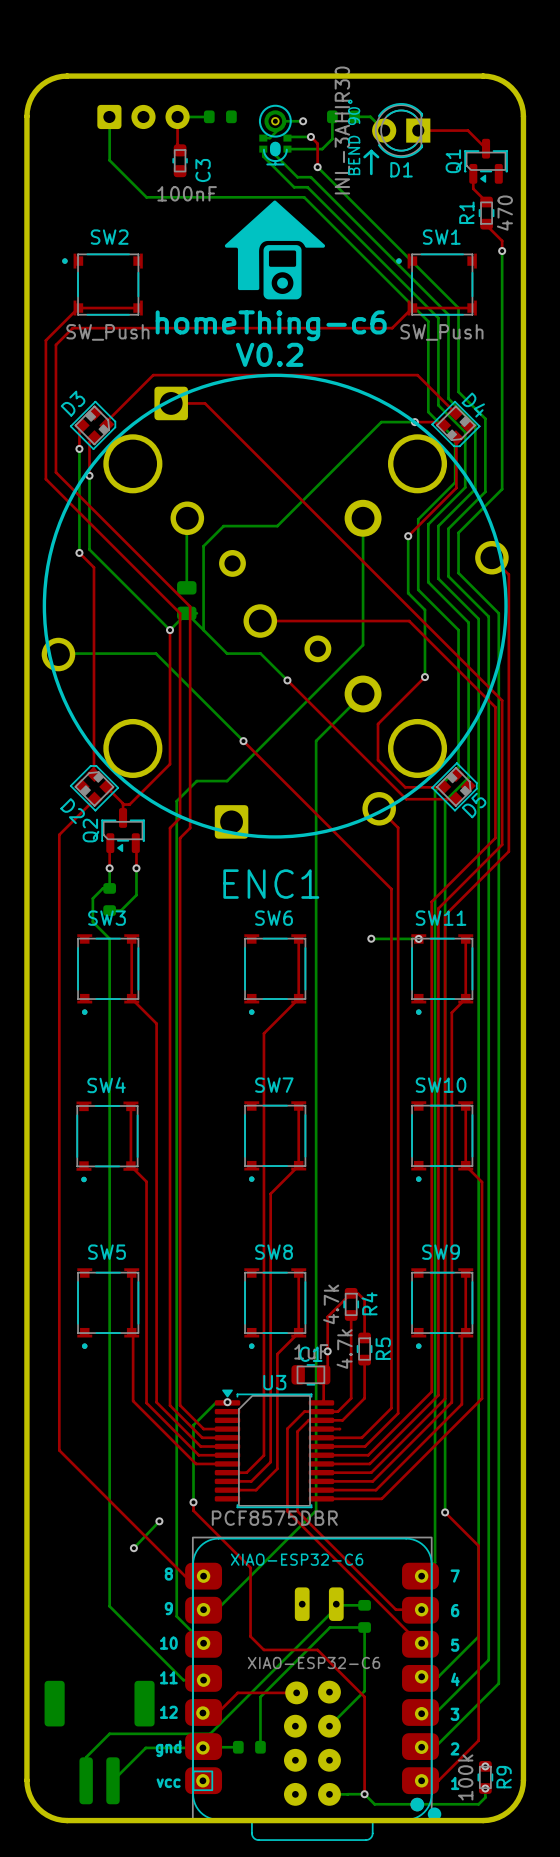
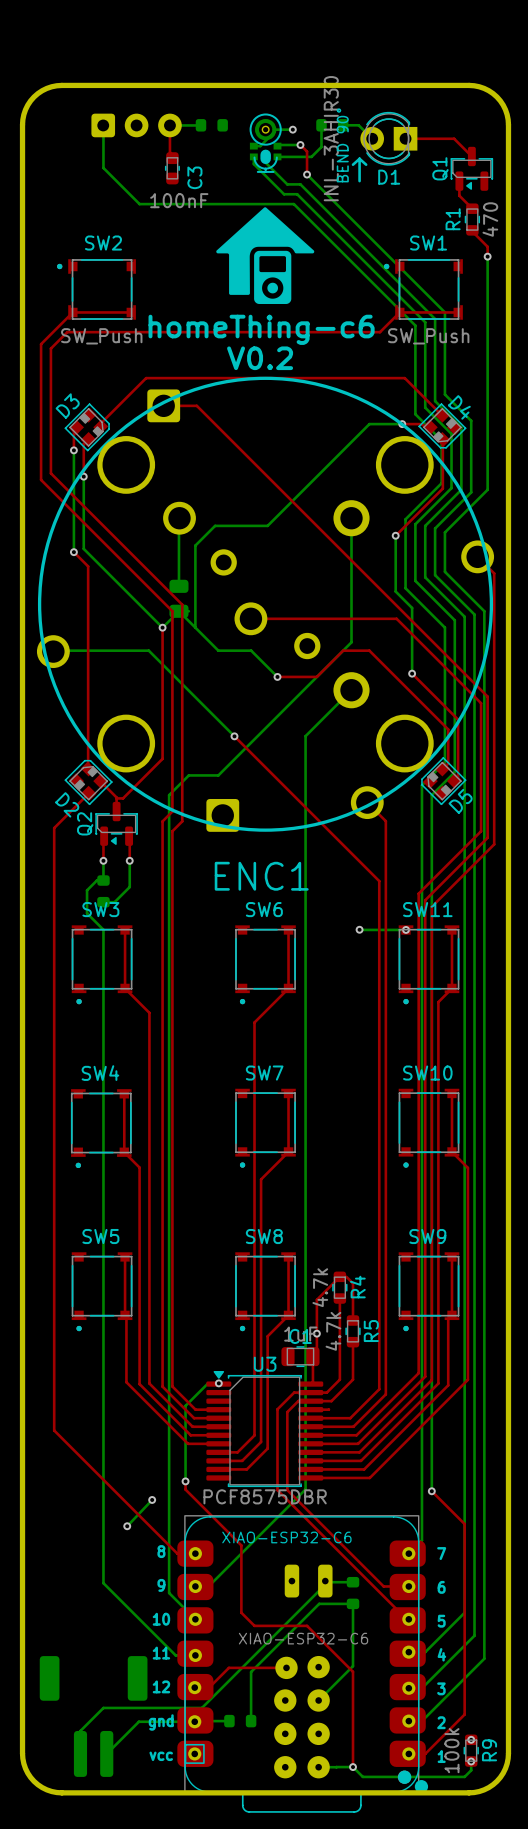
top track: (424, 677) (378, 724) (378, 760) (405, 787) (443, 787) -> (412, 673) (458, 719) (458, 777) (454, 780)
top track: (287, 680) (406, 799) (455, 799) -> (277, 676) (316, 676) (343, 650) (369, 650) (448, 729) (448, 763) (442, 769)
D5 rotation: 0° (454, 786) -> 180° (443, 781)

